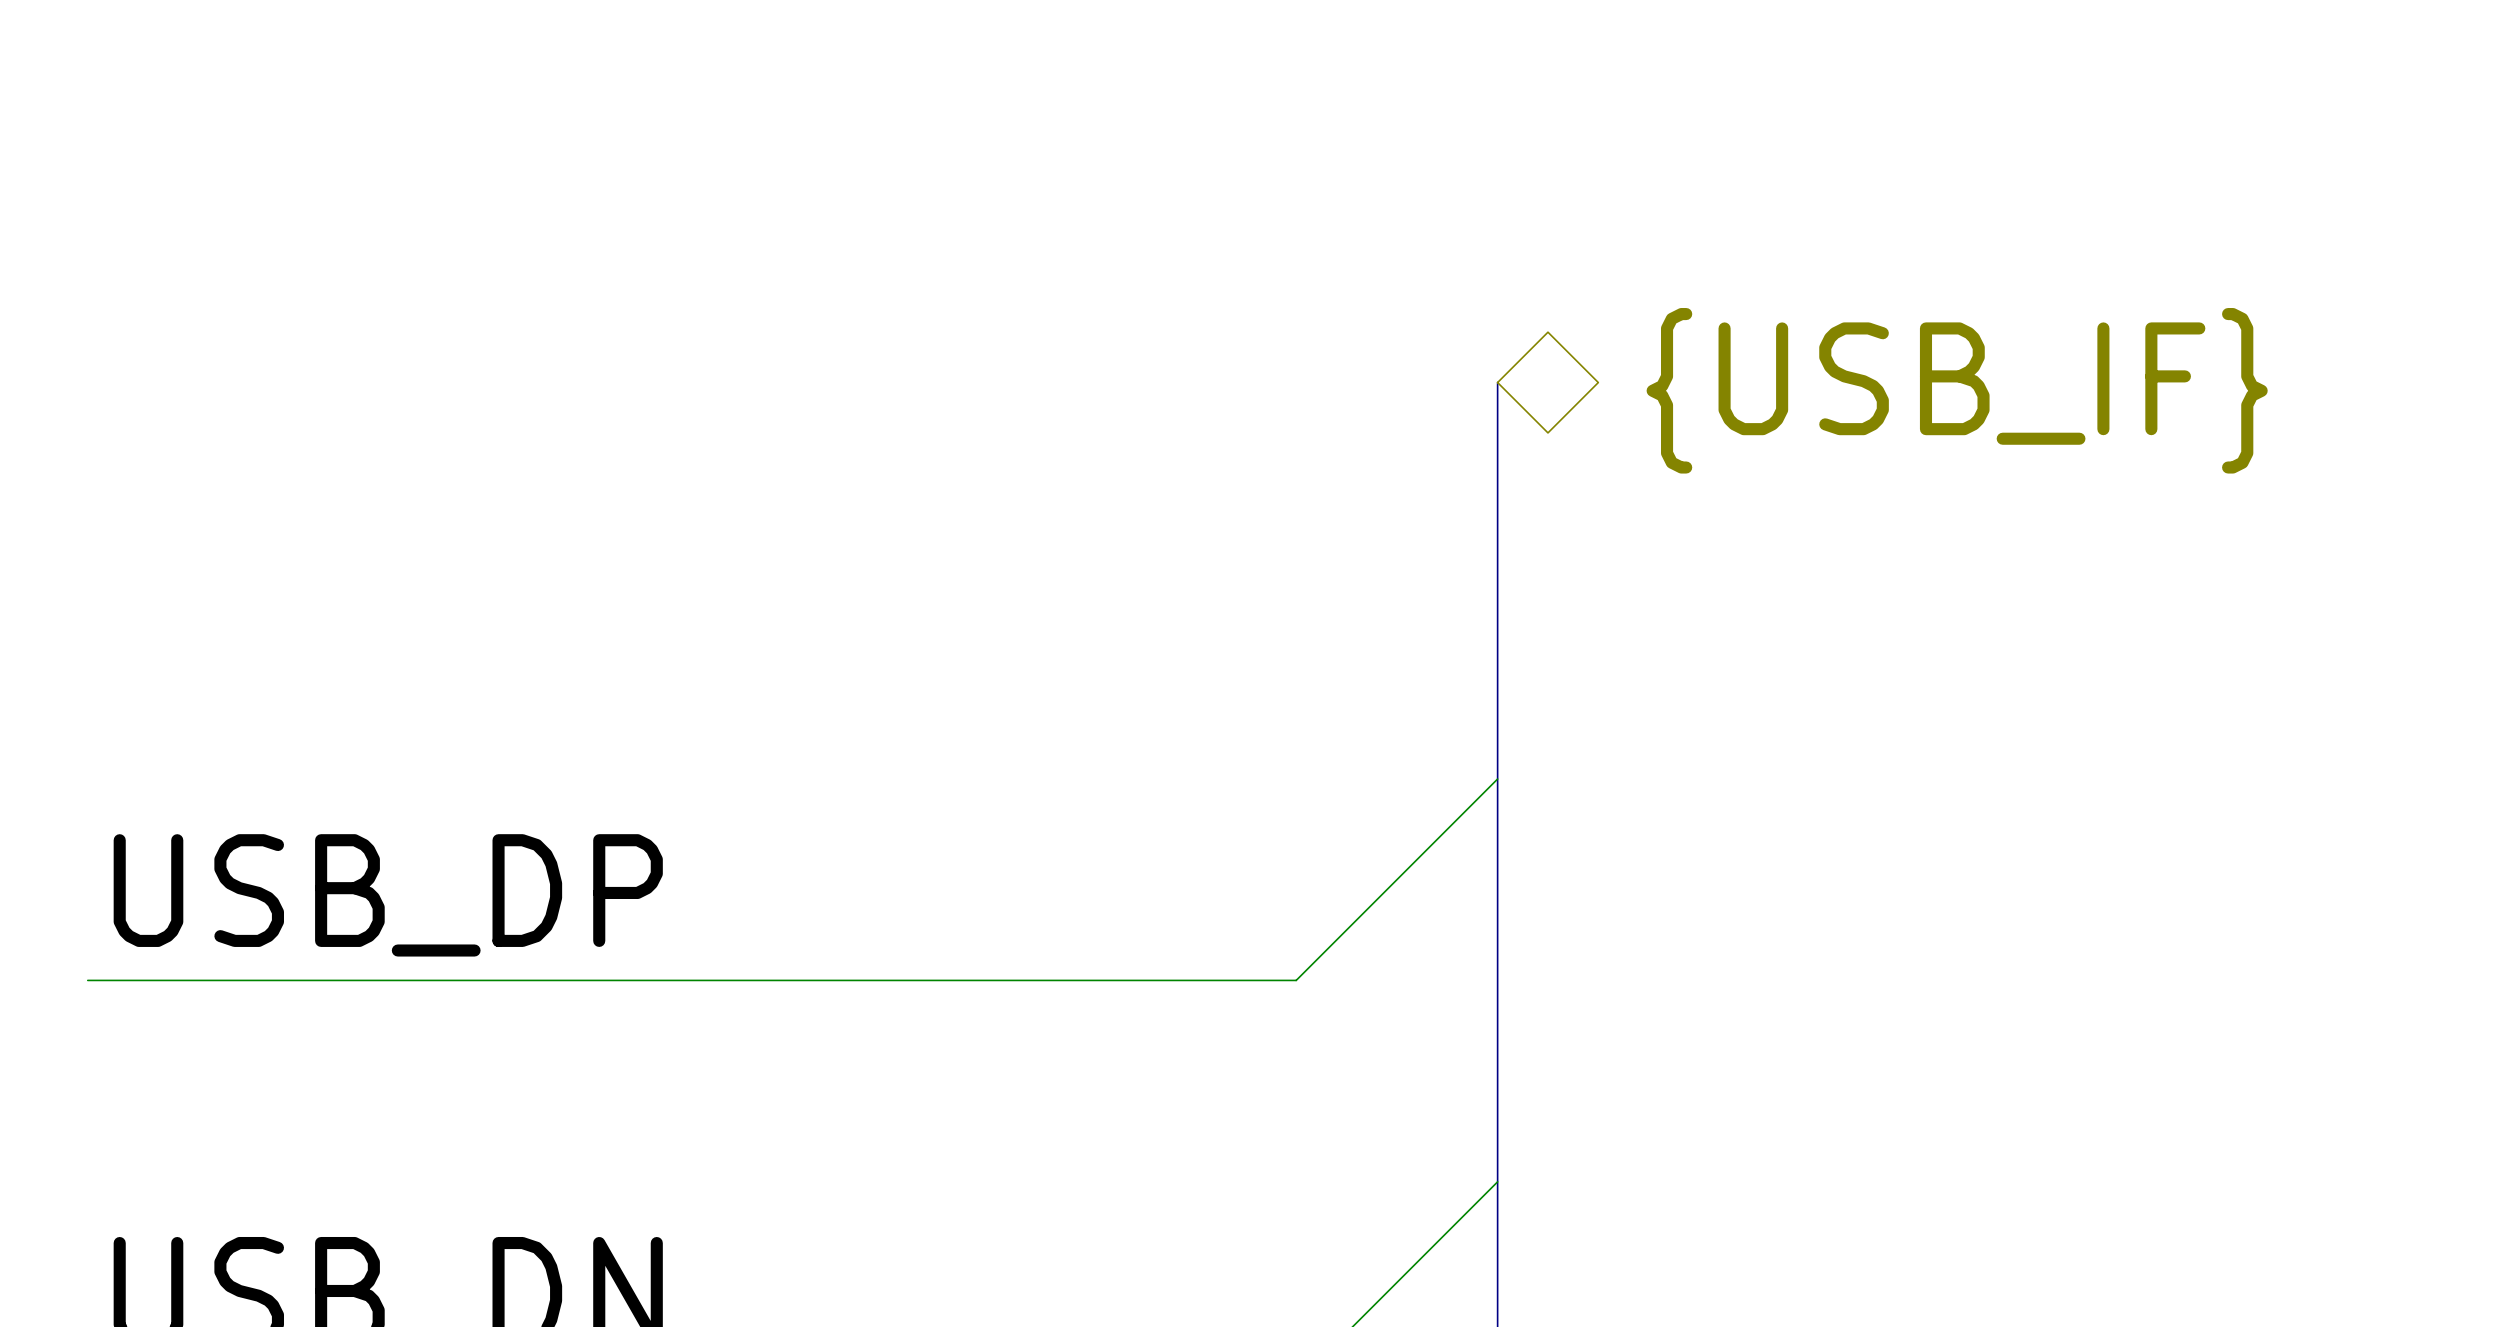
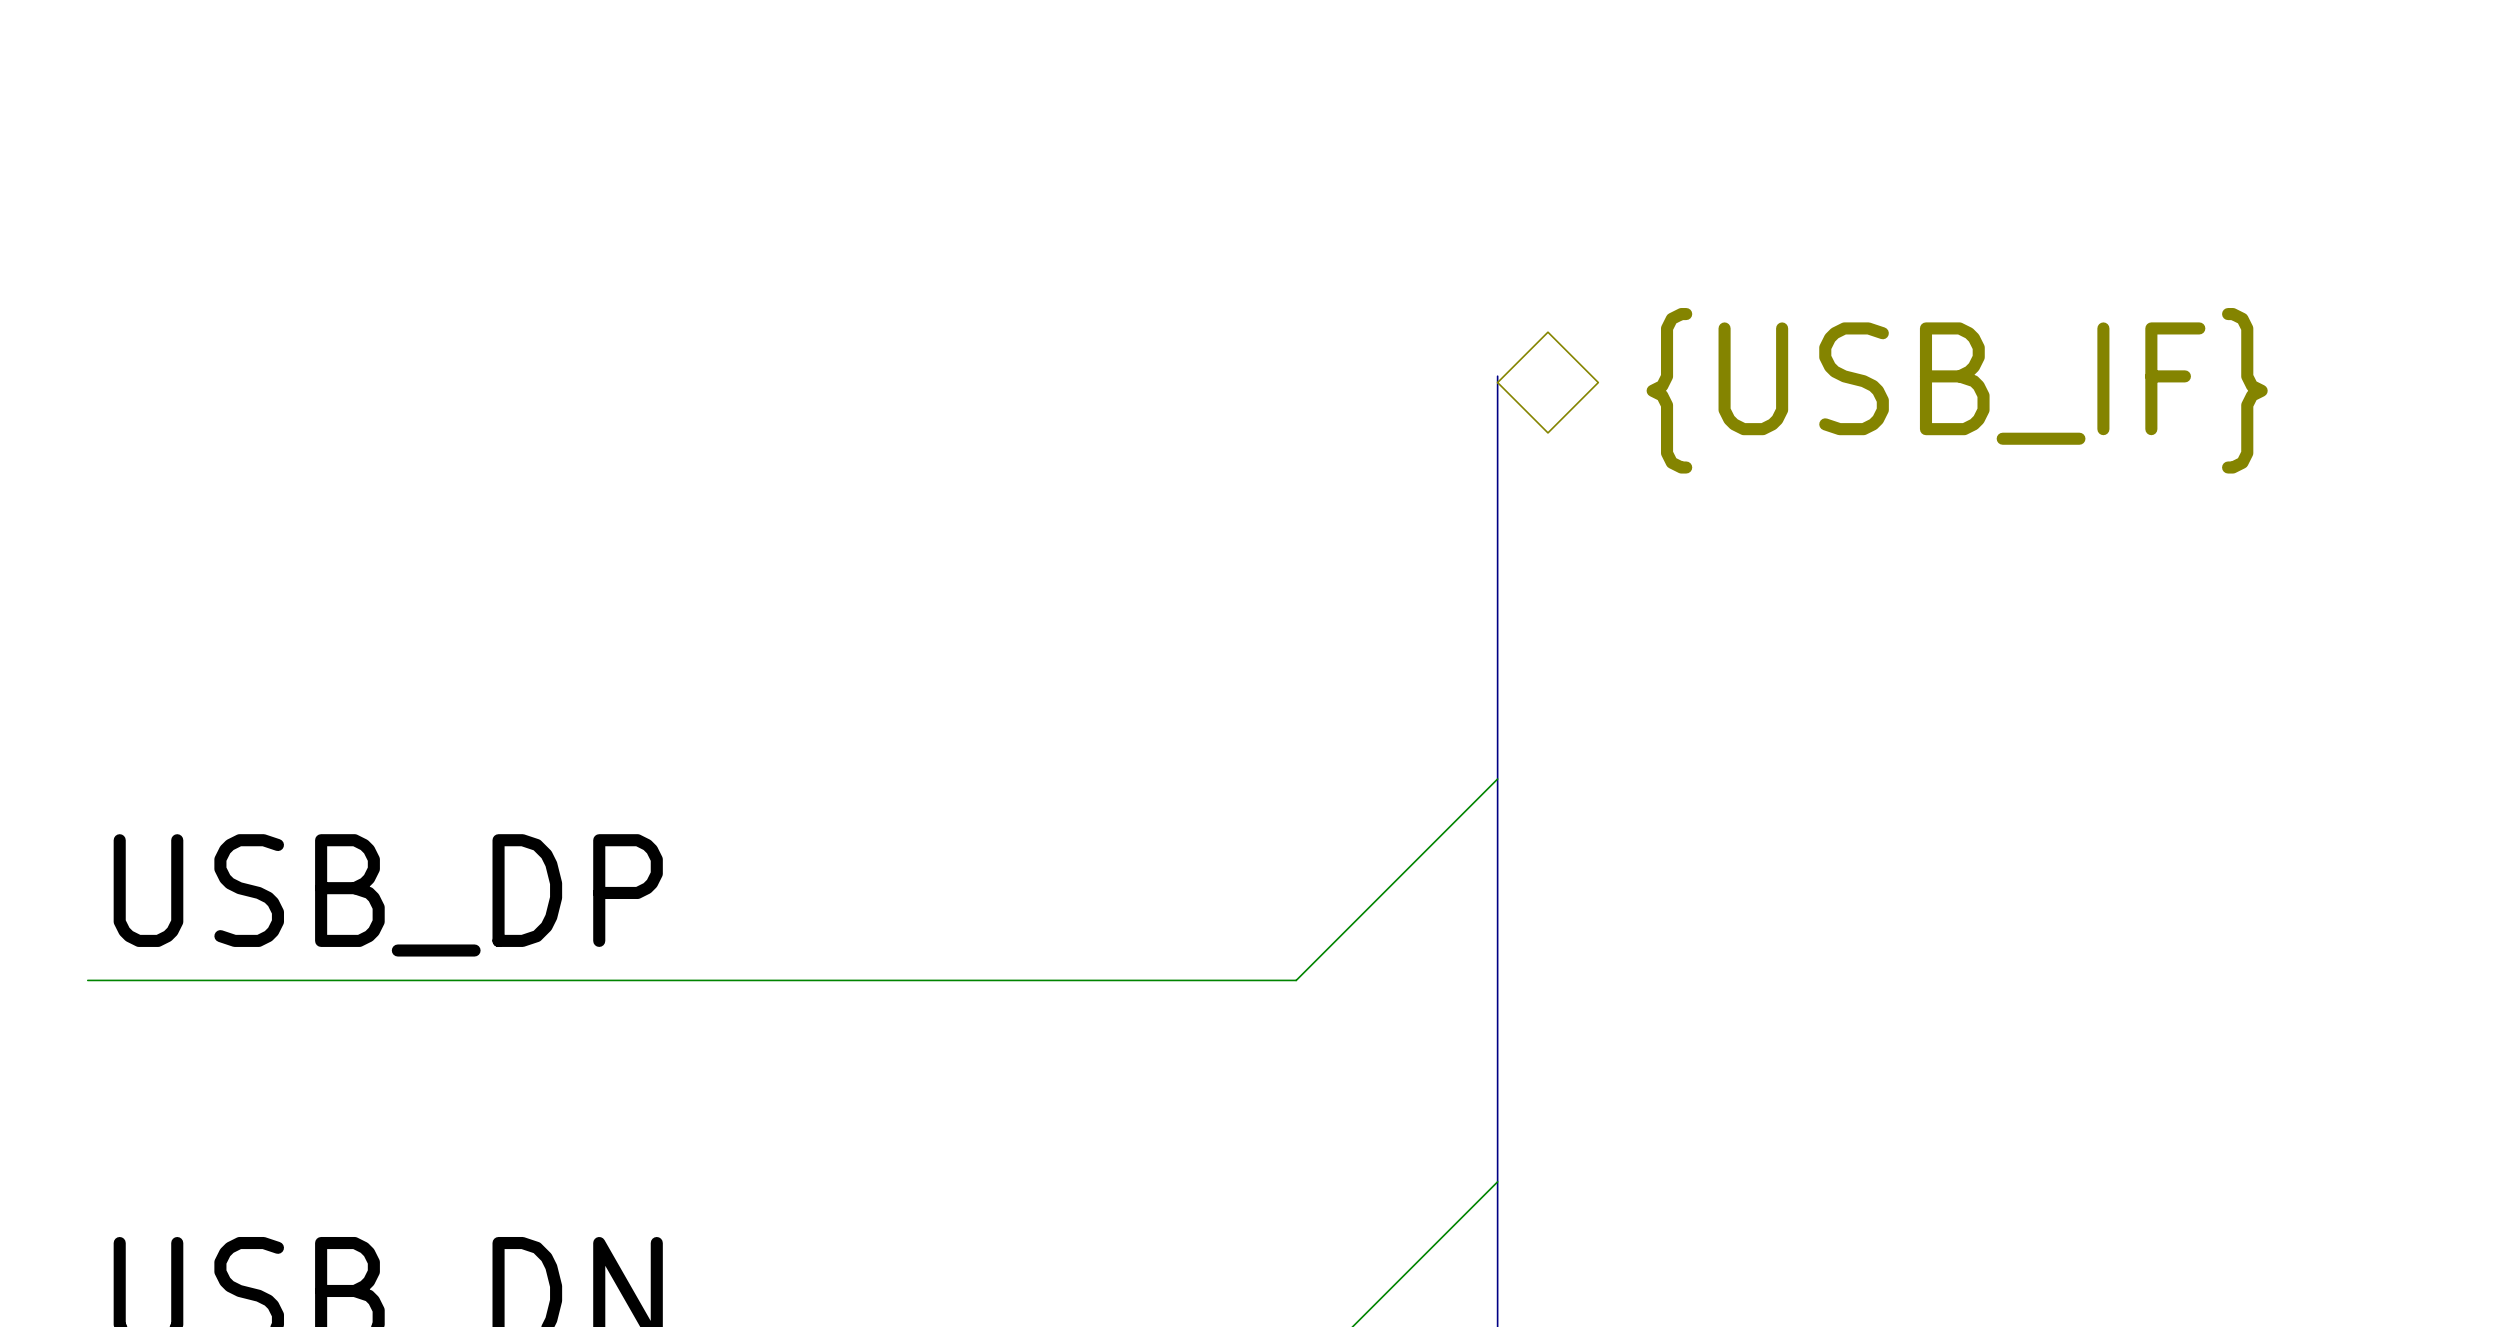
bus: none -> (1497, 376) (1497, 382)

